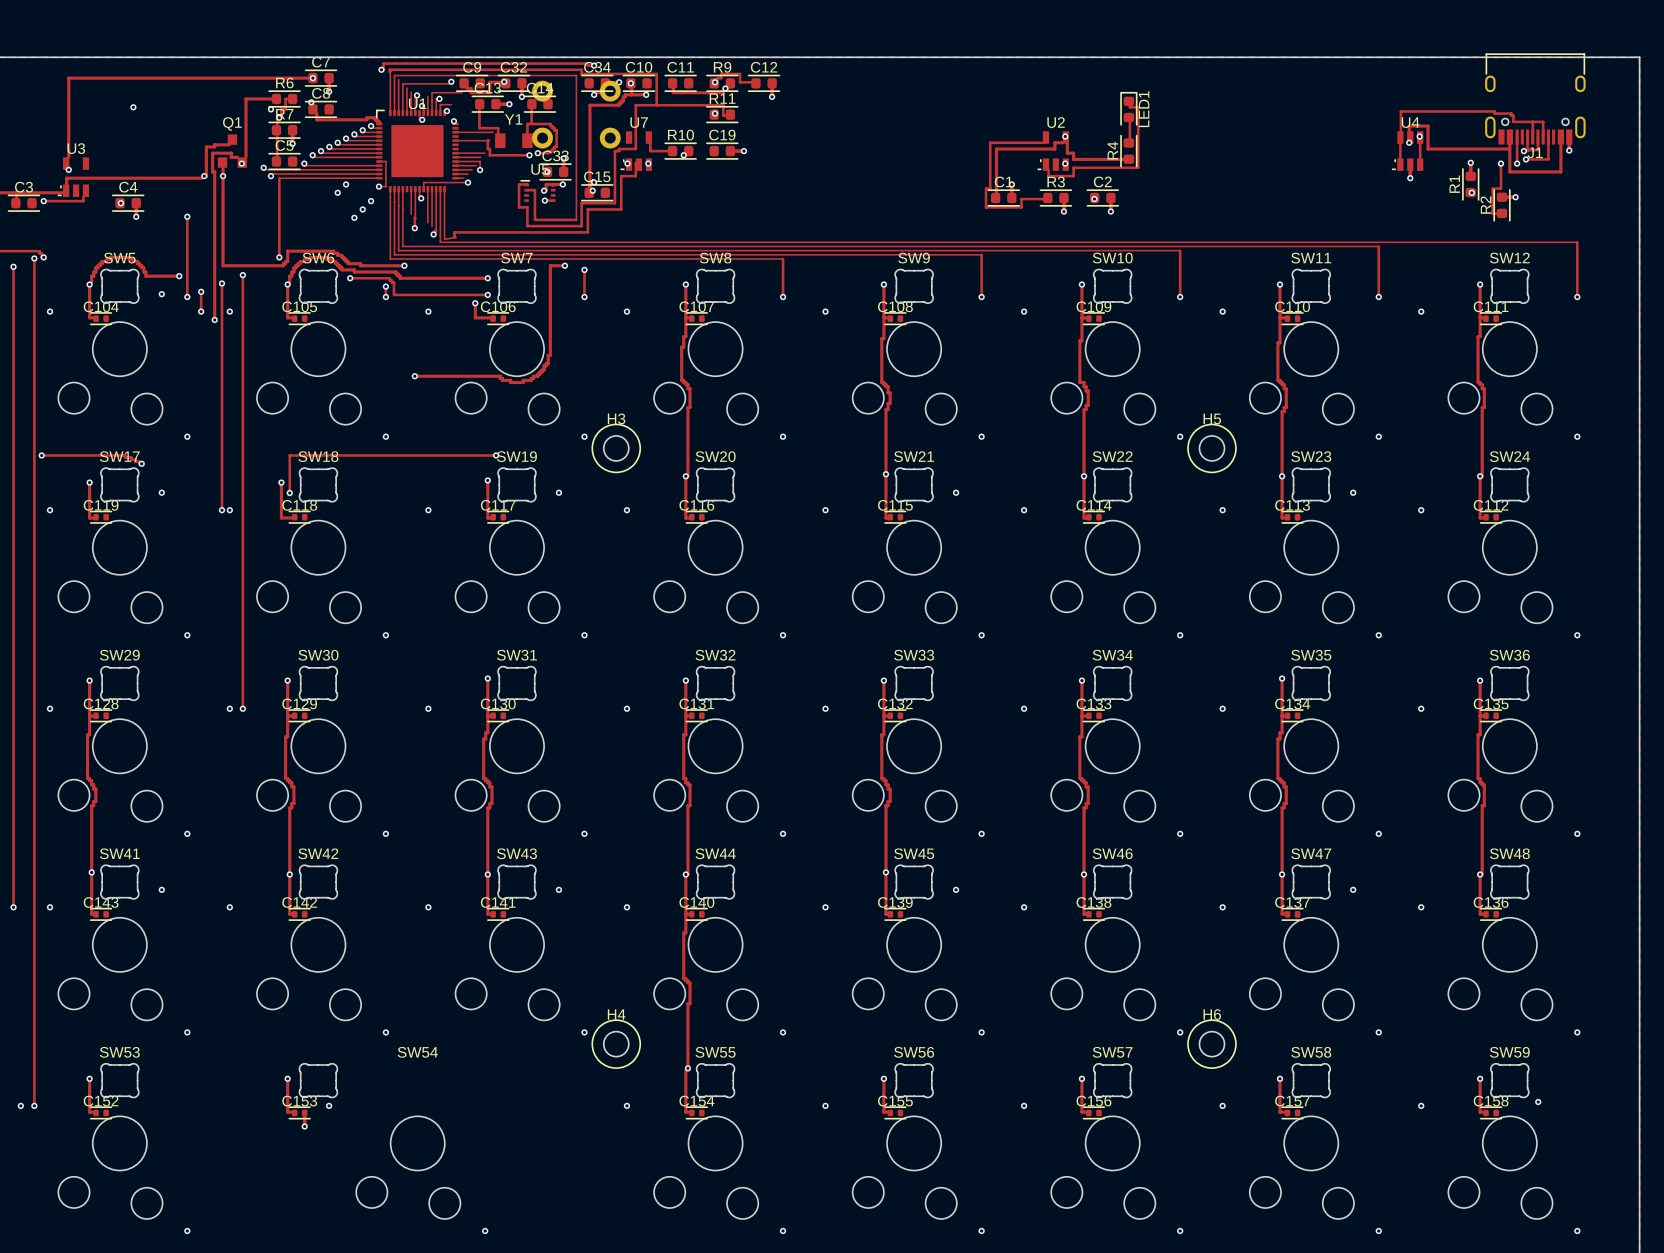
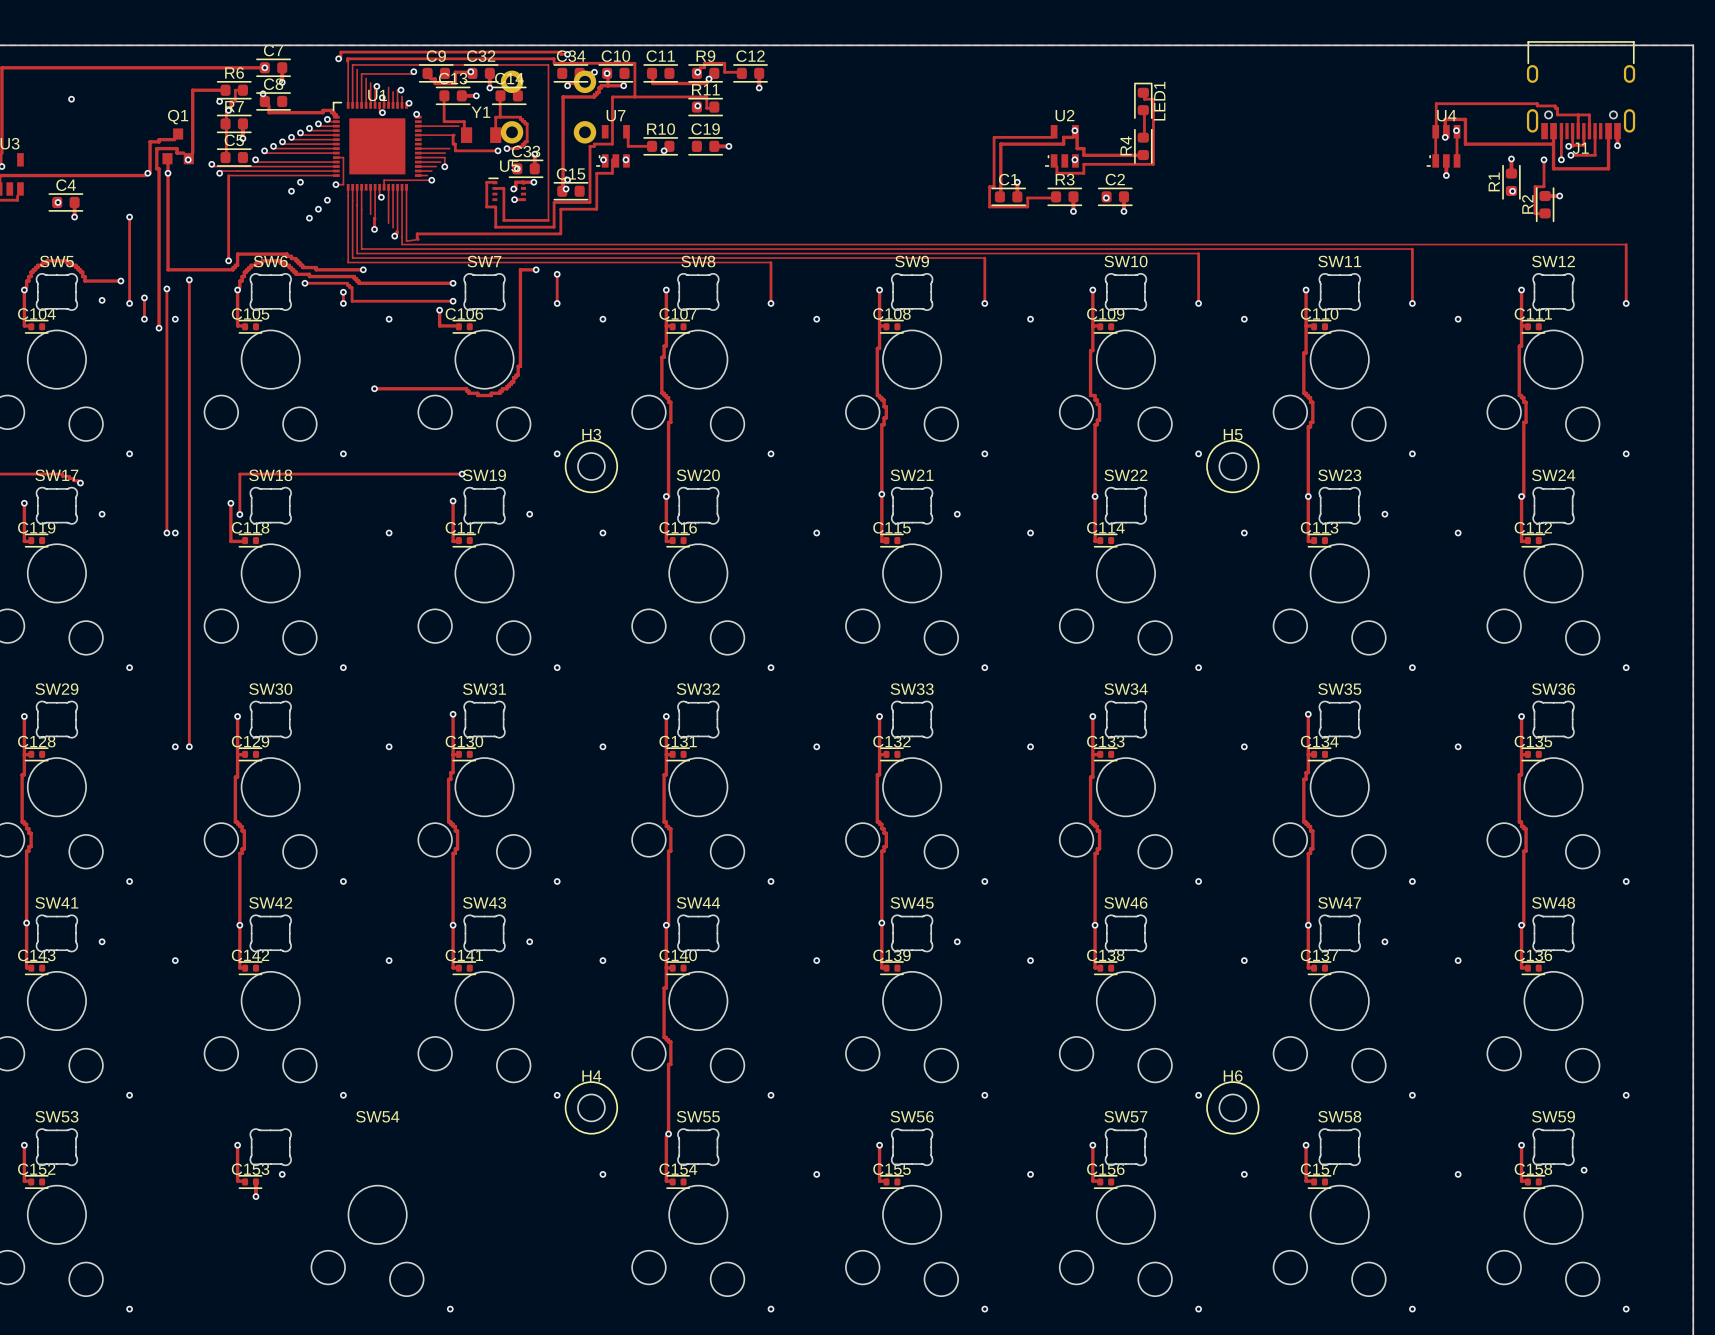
track: (461, 92) (432, 92) (432, 100) -> none
track: (440, 104) (451, 104) -> none

